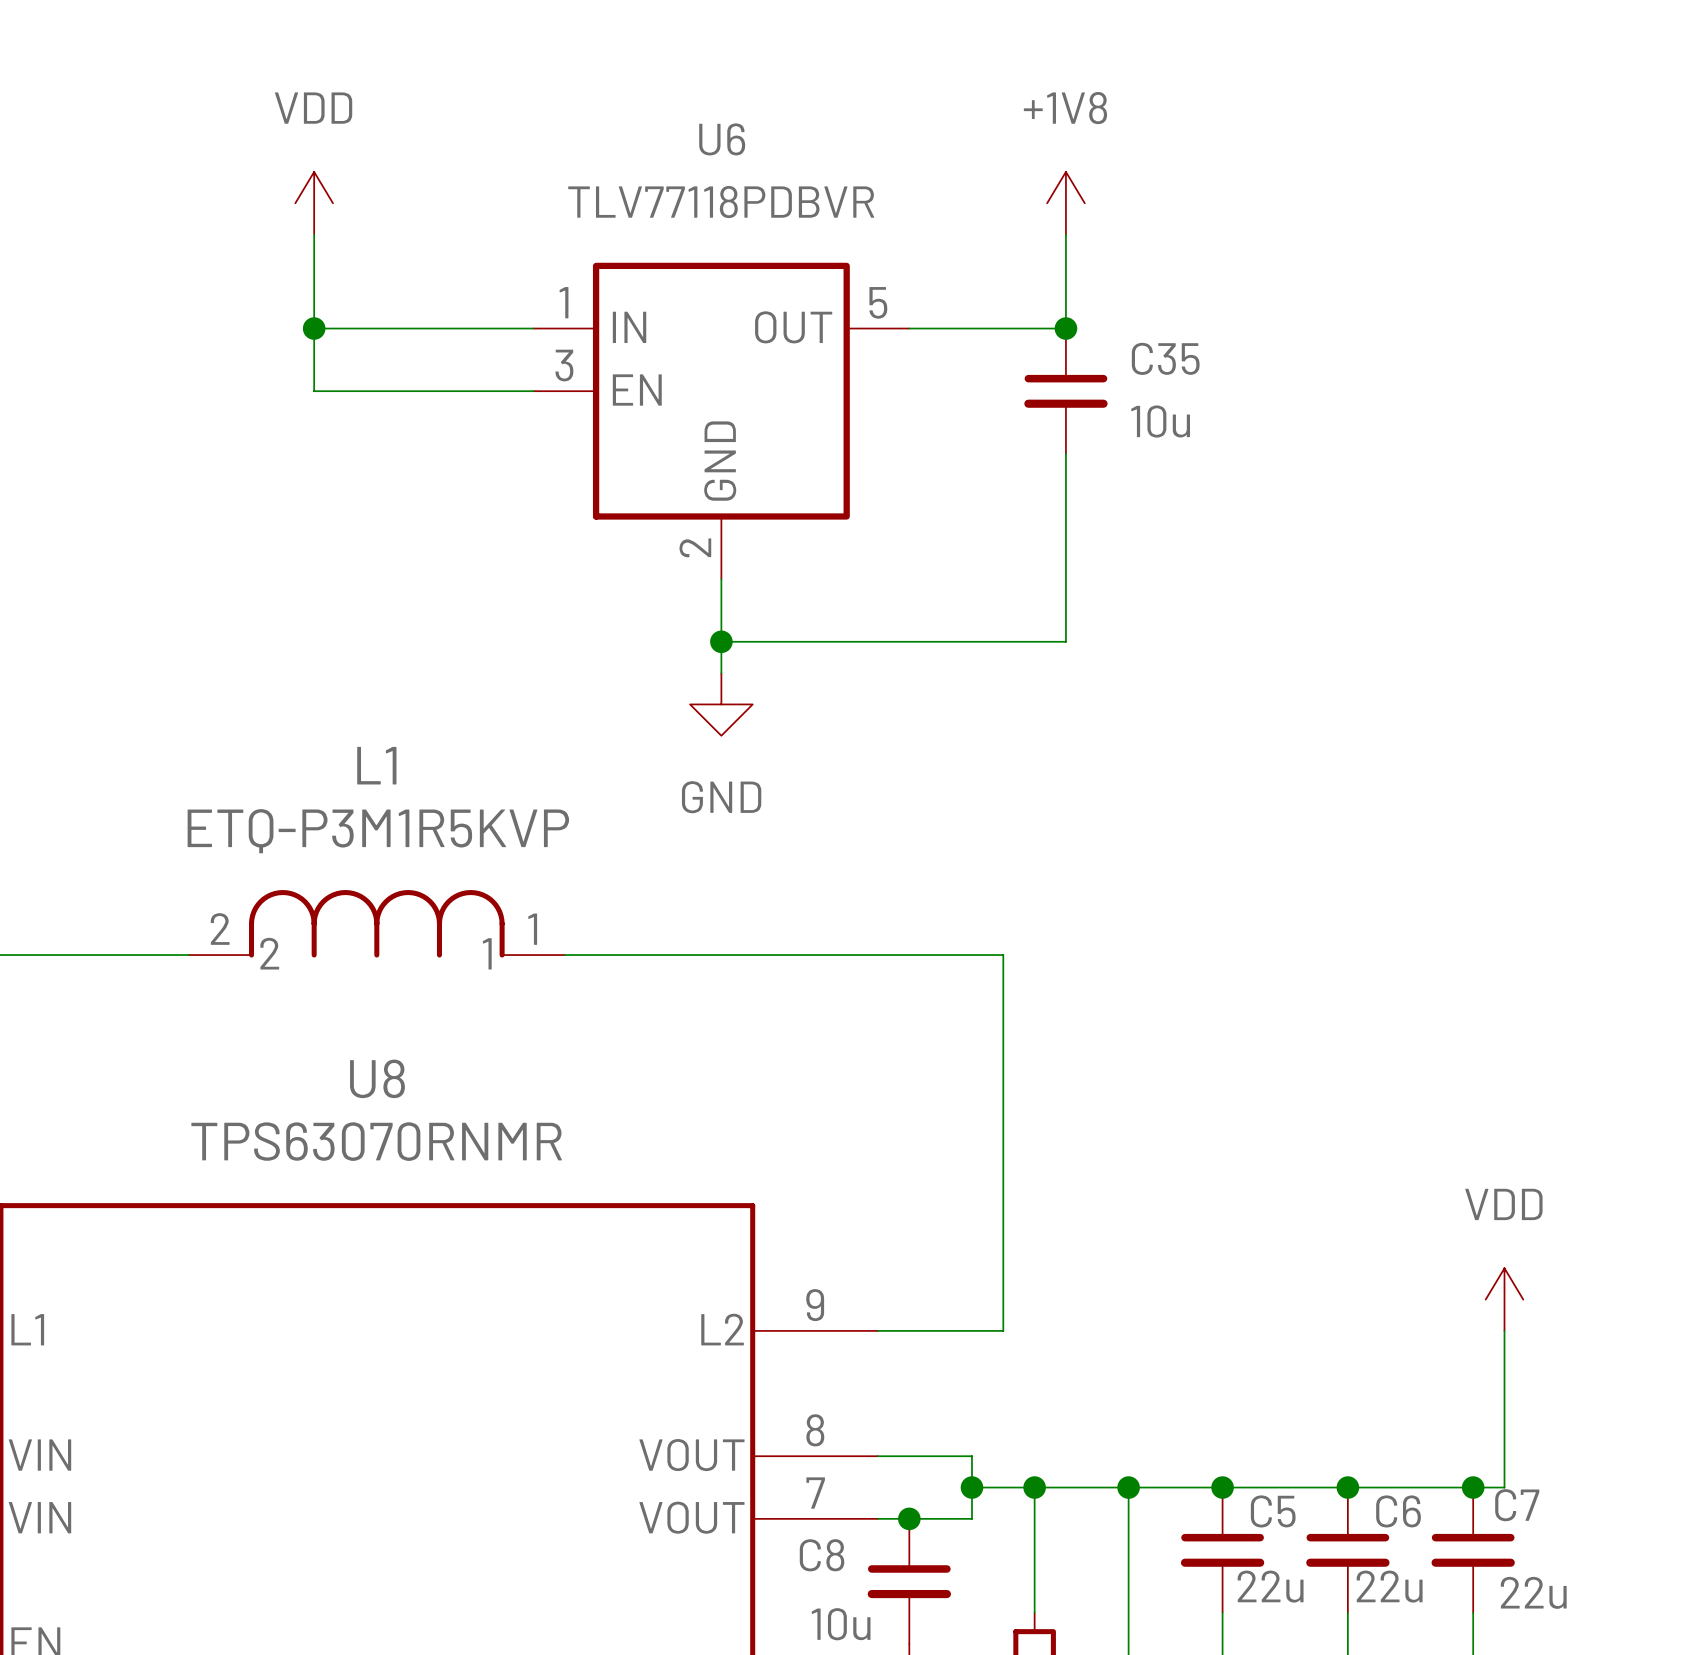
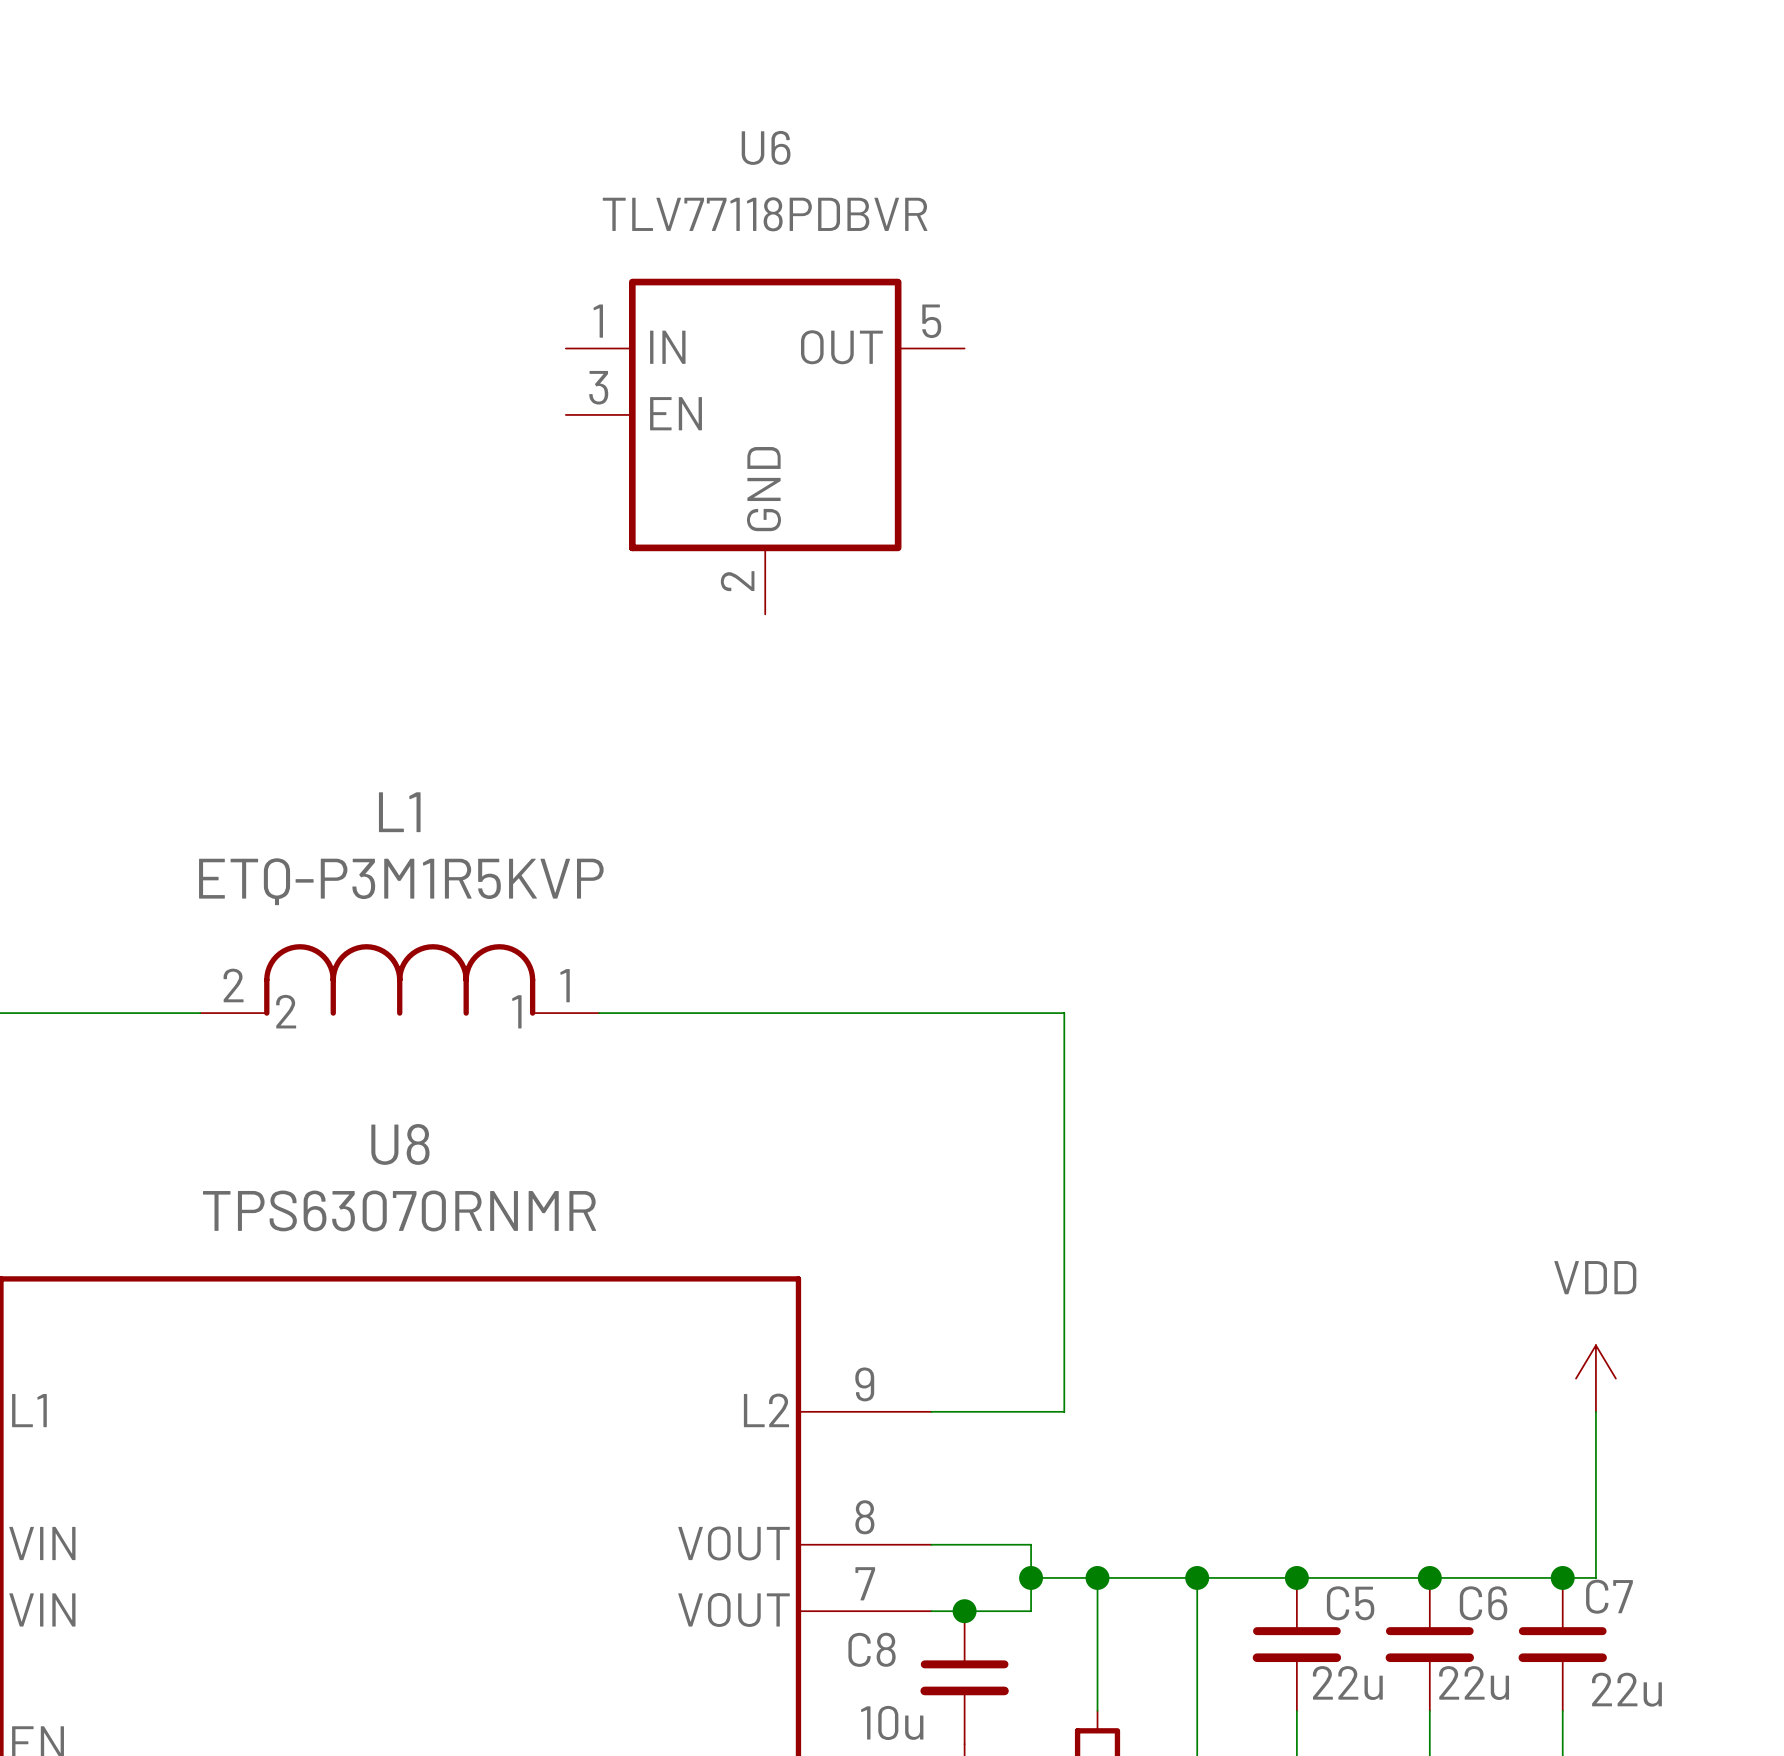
power symbol: VDD (314, 203) -> none
power symbol: +1V8 (1065, 203) -> none
wire: (314, 234) (314, 391) (533, 391) -> none
wire: (1065, 234) (1065, 328) (909, 328) -> none
wire: (314, 328) (533, 328) -> none
junction: (314, 328) -> none
junction: (1065, 328) -> none
C35: 10u (1065, 391) -> none
wire: (1065, 453) (1065, 641) (721, 641) -> none
wire: (721, 579) (721, 673) -> none
junction: (721, 641) -> none
power symbol: GND (721, 704) -> none

